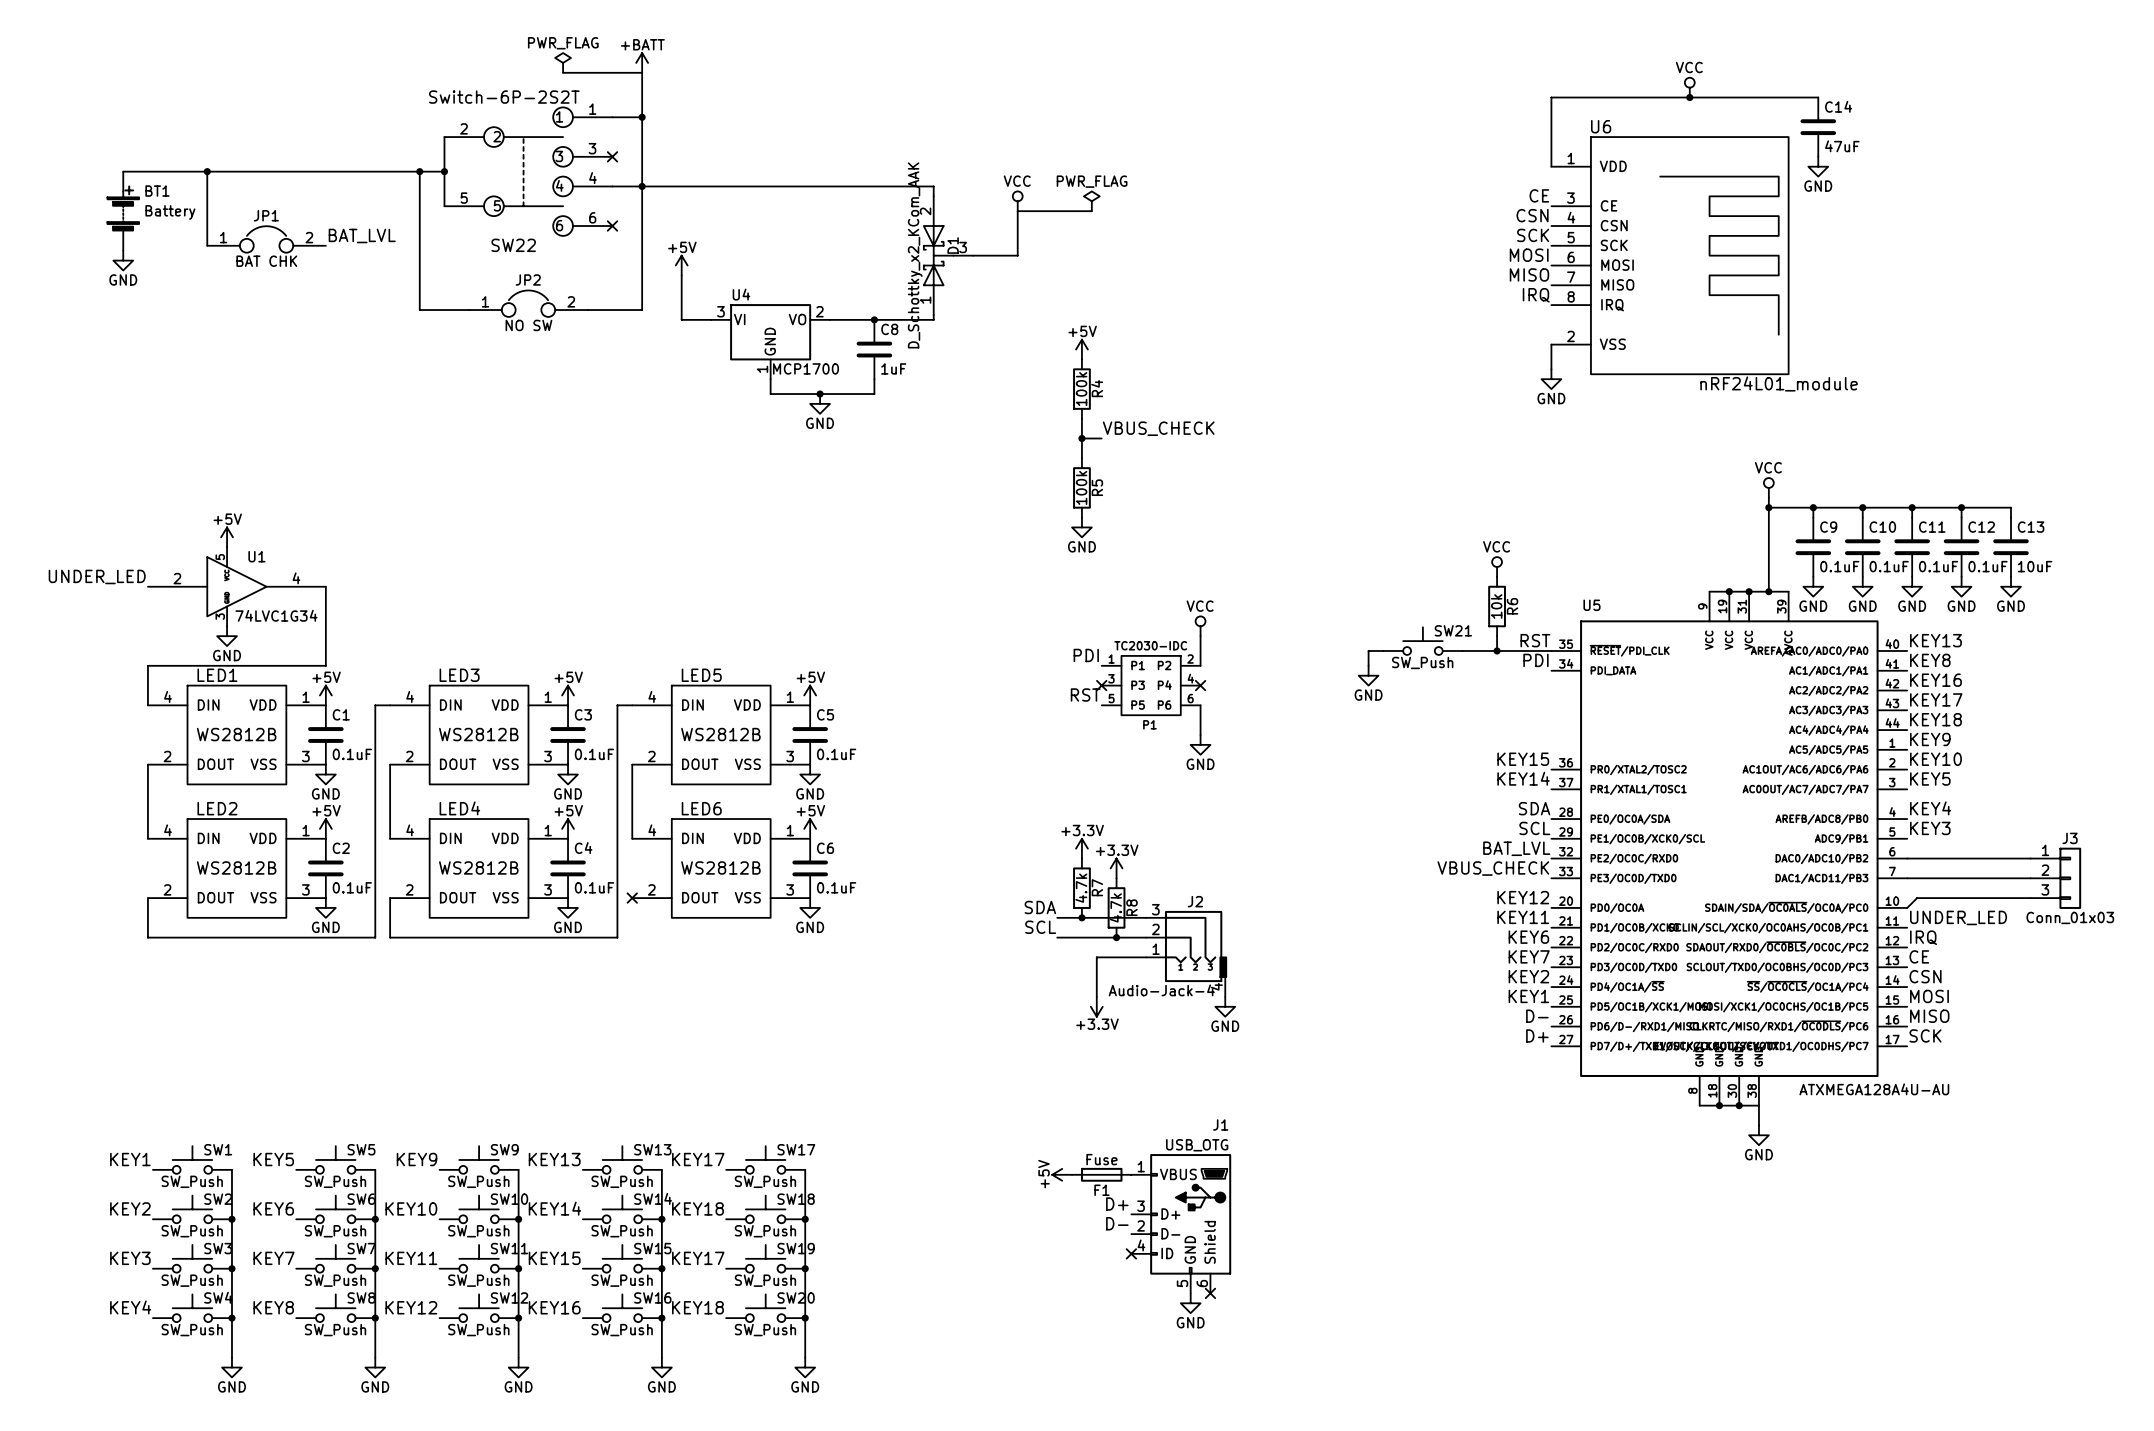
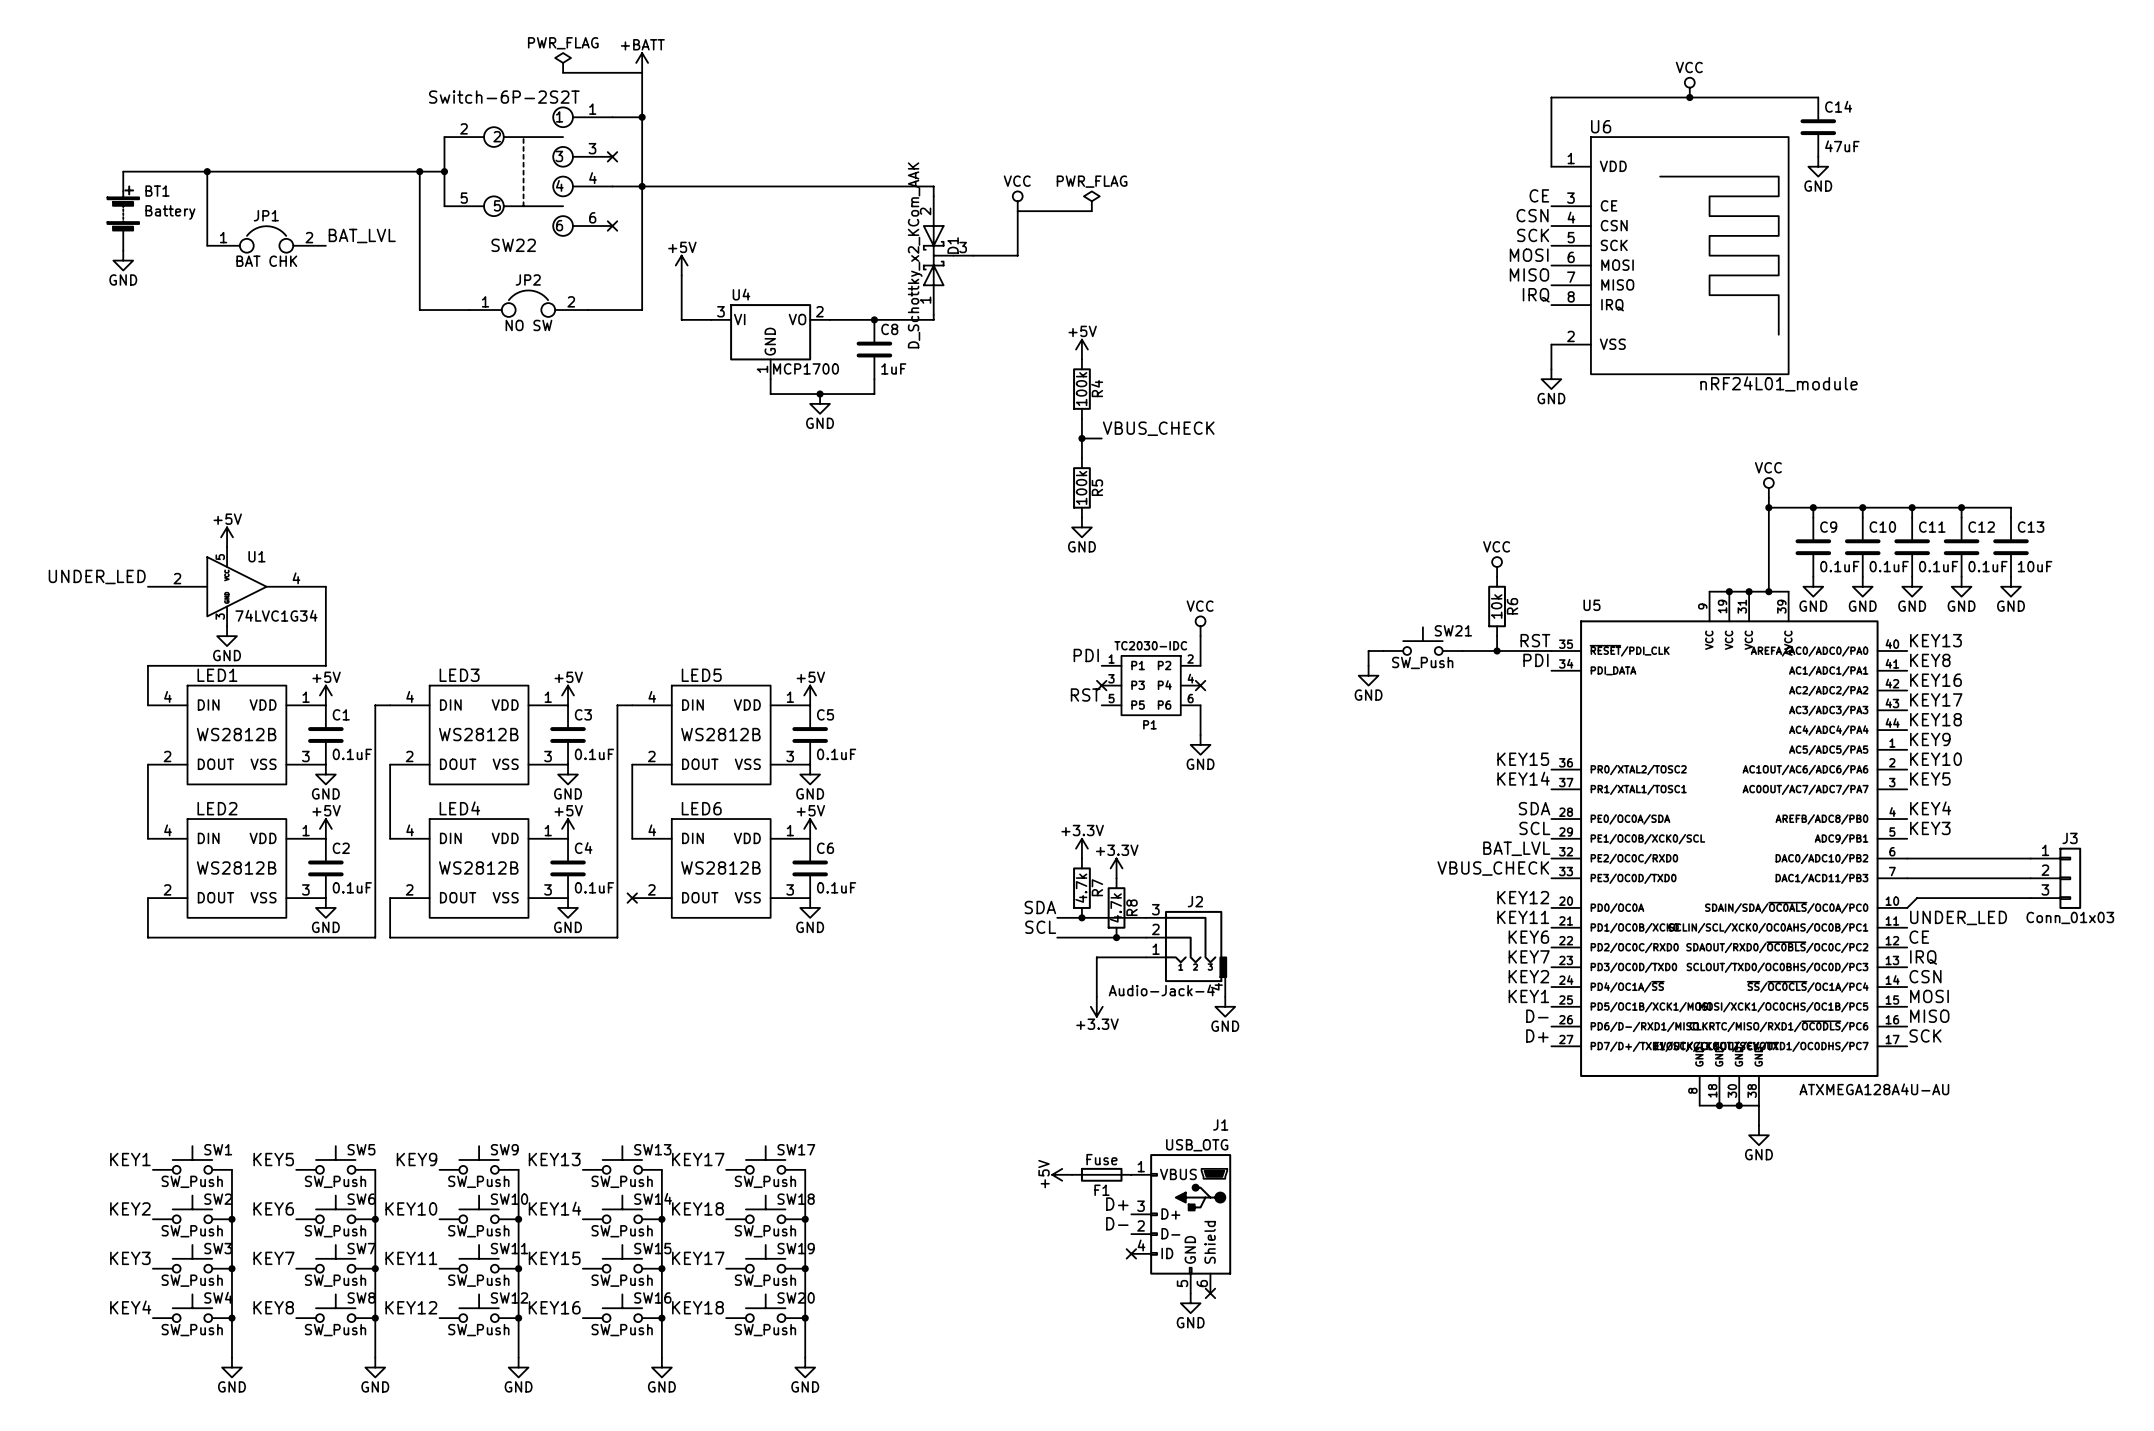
label: IRQ (1923, 937) -> CE (1919, 937)
label: CE (1919, 956) -> IRQ (1923, 957)

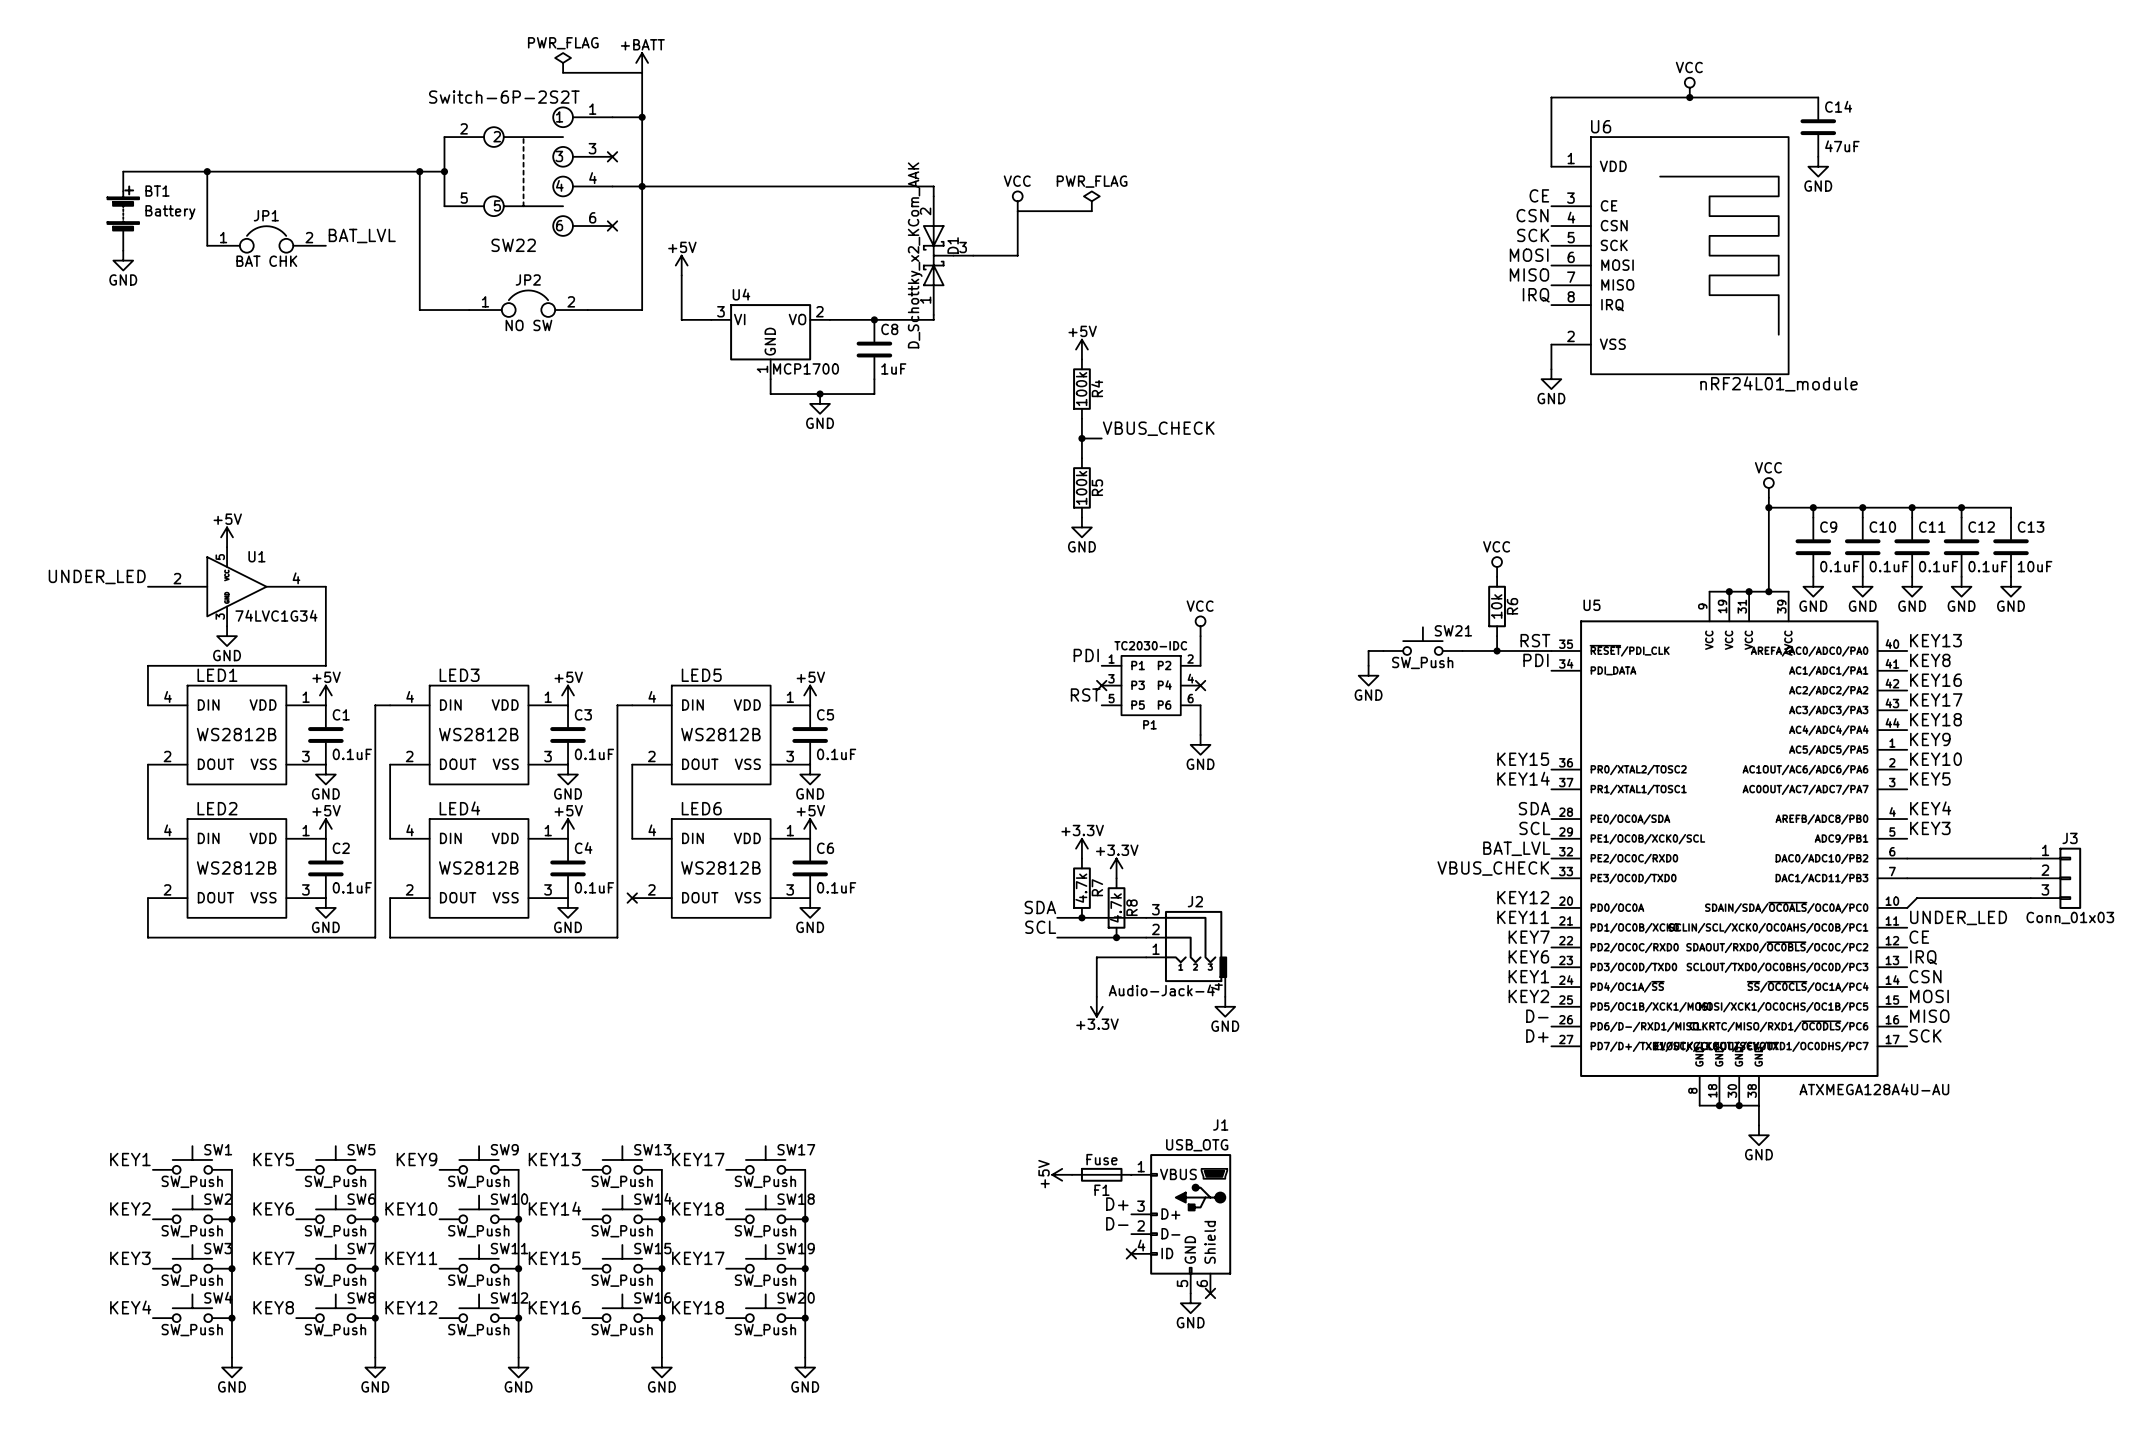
label: KEY6 (1528, 937) -> KEY7 (1529, 937)
label: KEY7 (1529, 956) -> KEY6 (1528, 956)
label: KEY2 (1528, 976) -> KEY1 (1528, 976)
label: KEY1 (1528, 996) -> KEY2 (1528, 996)

